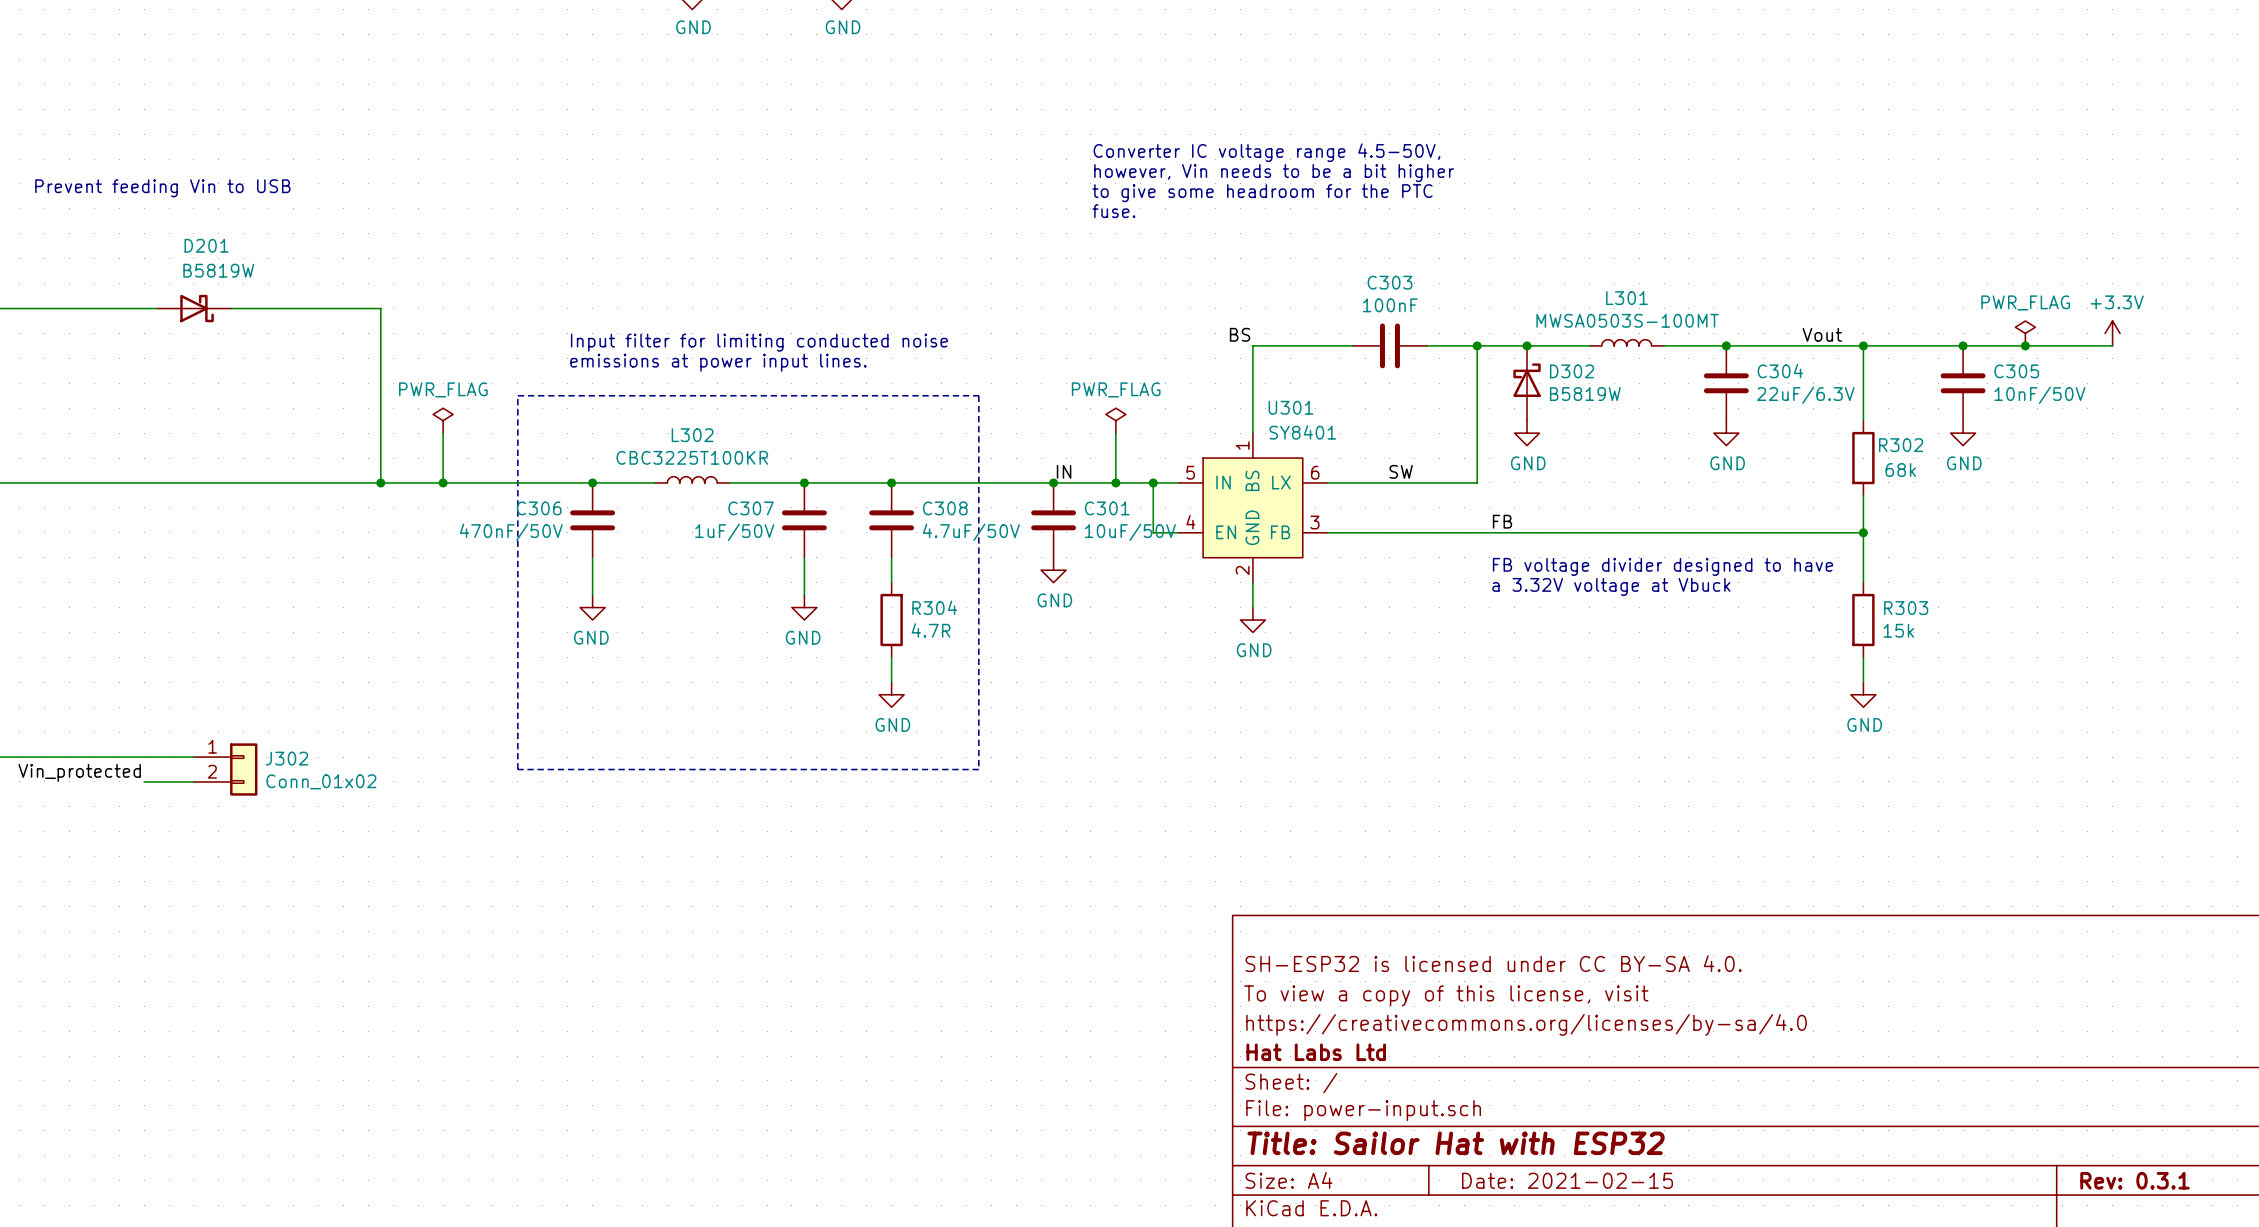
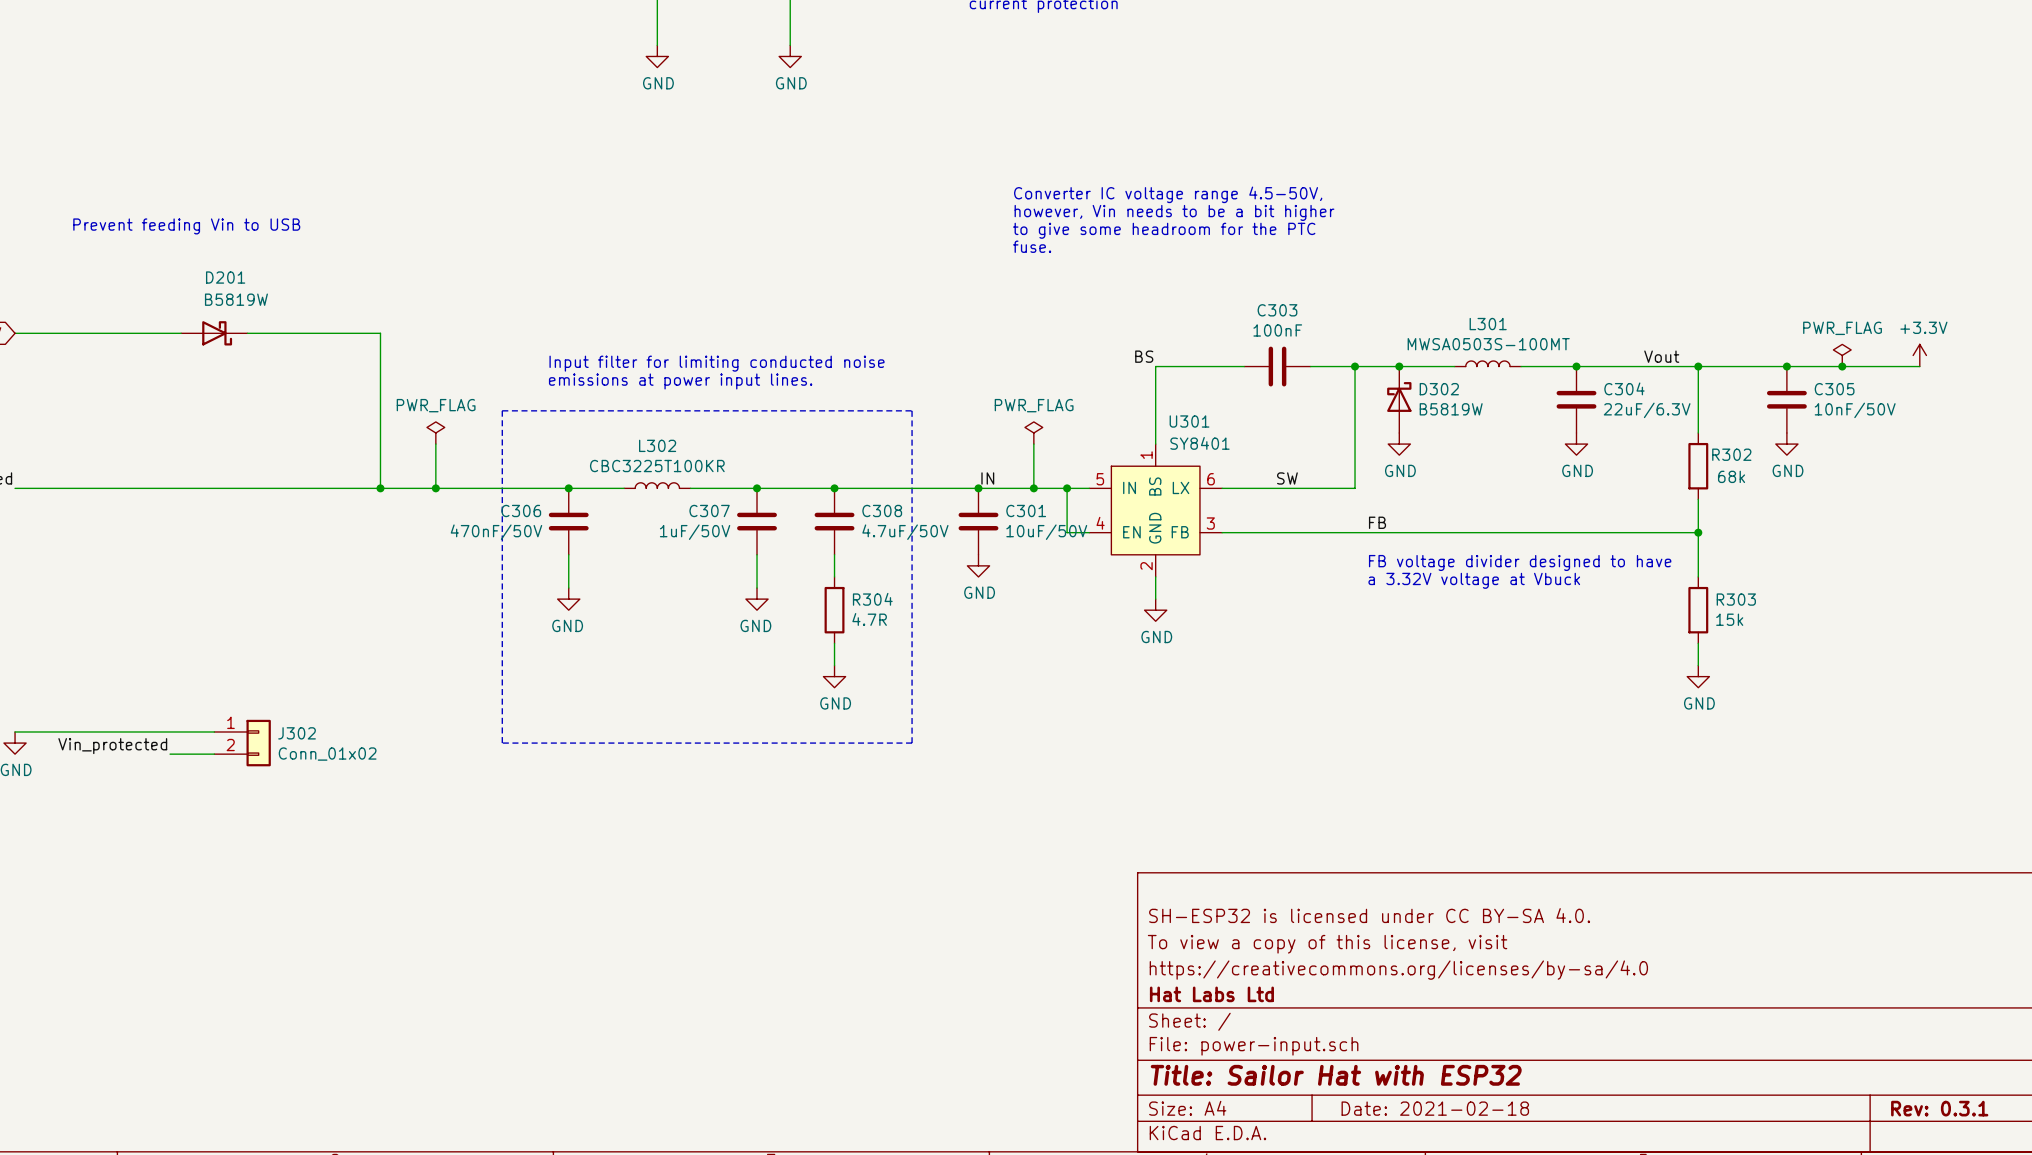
title block: Date: 2021-02-15 (1567, 1180) -> Date: 2021-02-18 (1435, 1108)

